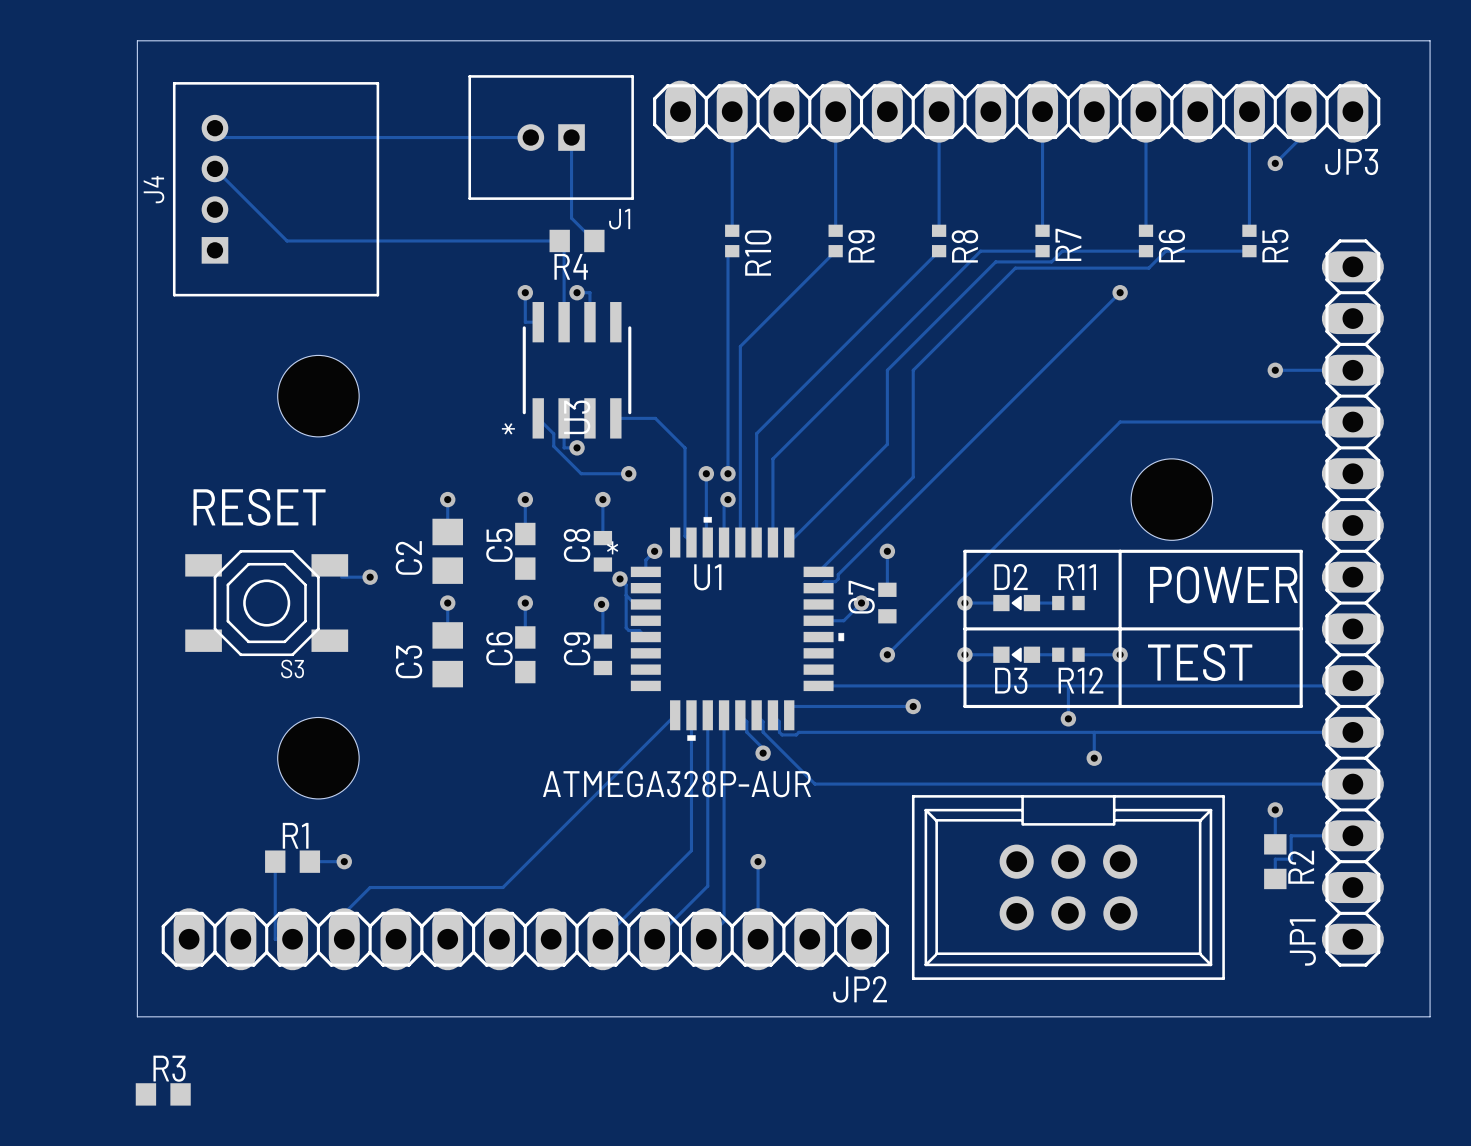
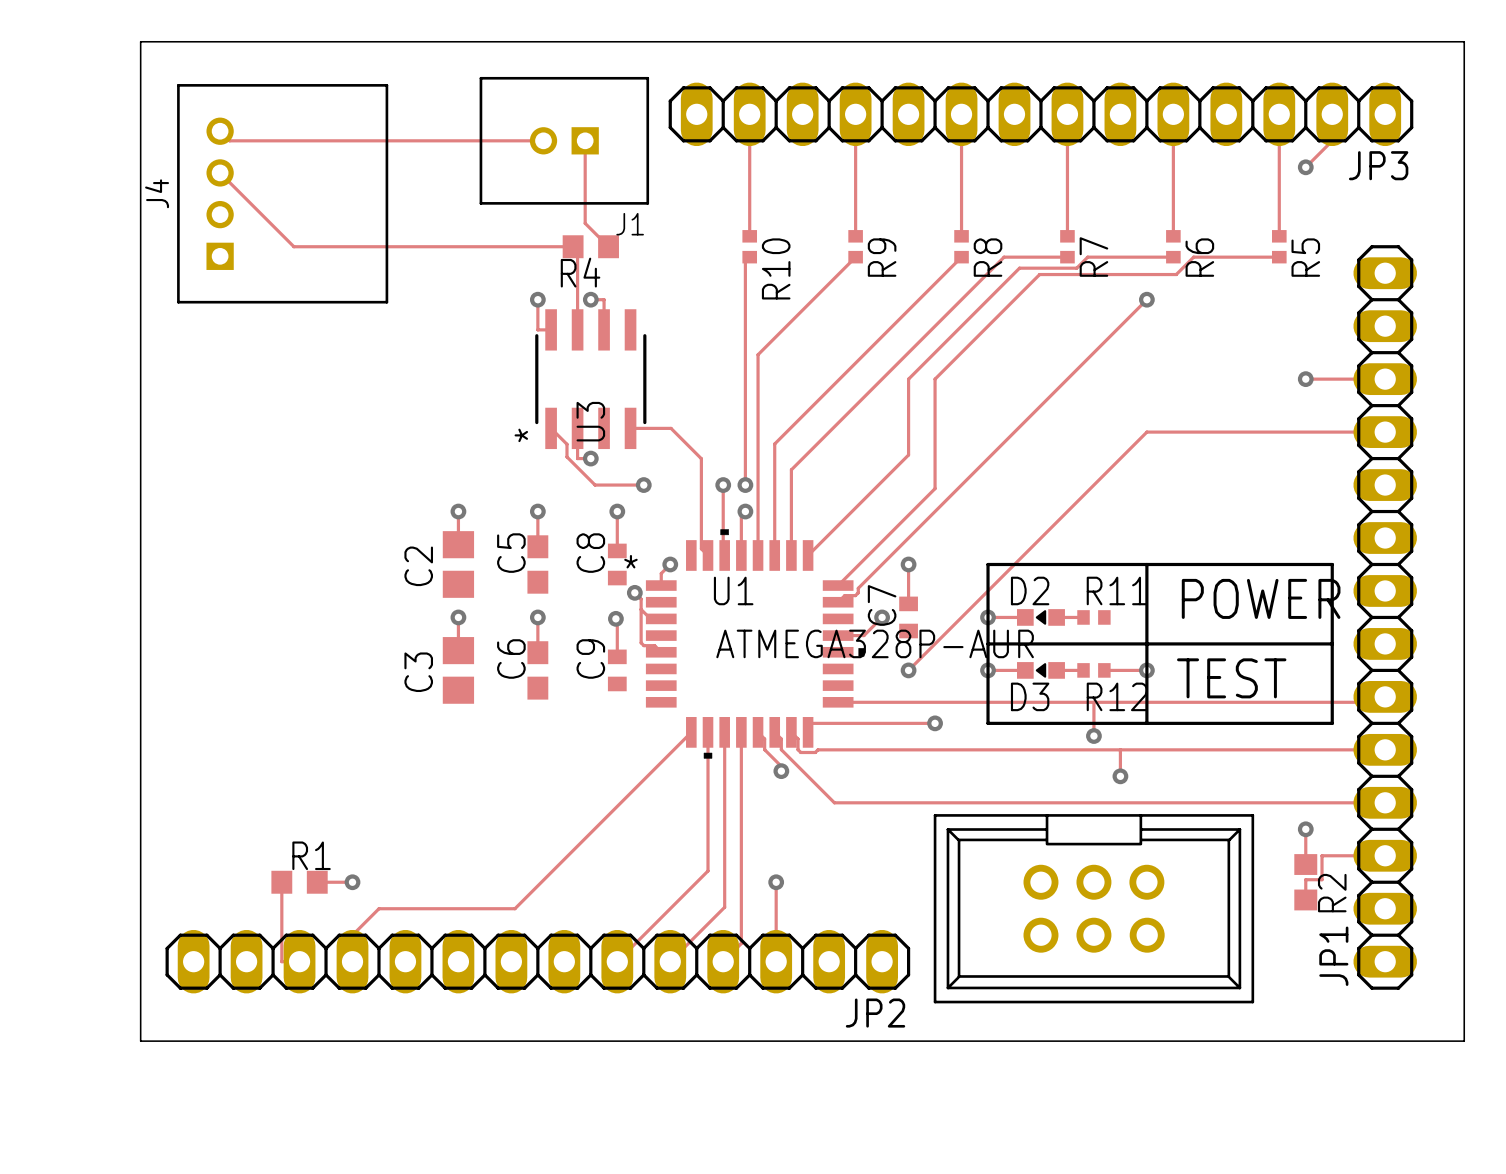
hole: (318, 396) -> none
hole: (1171, 499) -> none
text: RESET (259, 507) -> none
track: (341, 577) (370, 577) -> none
via: (370, 577) -> none
S3: (266, 603) -> none
hole: (318, 758) -> none
U1 value position: ATMEGA328P-AUR (676, 784) -> ATMEGA328P-AUR (875, 643)
R3: (163, 1094) -> none

